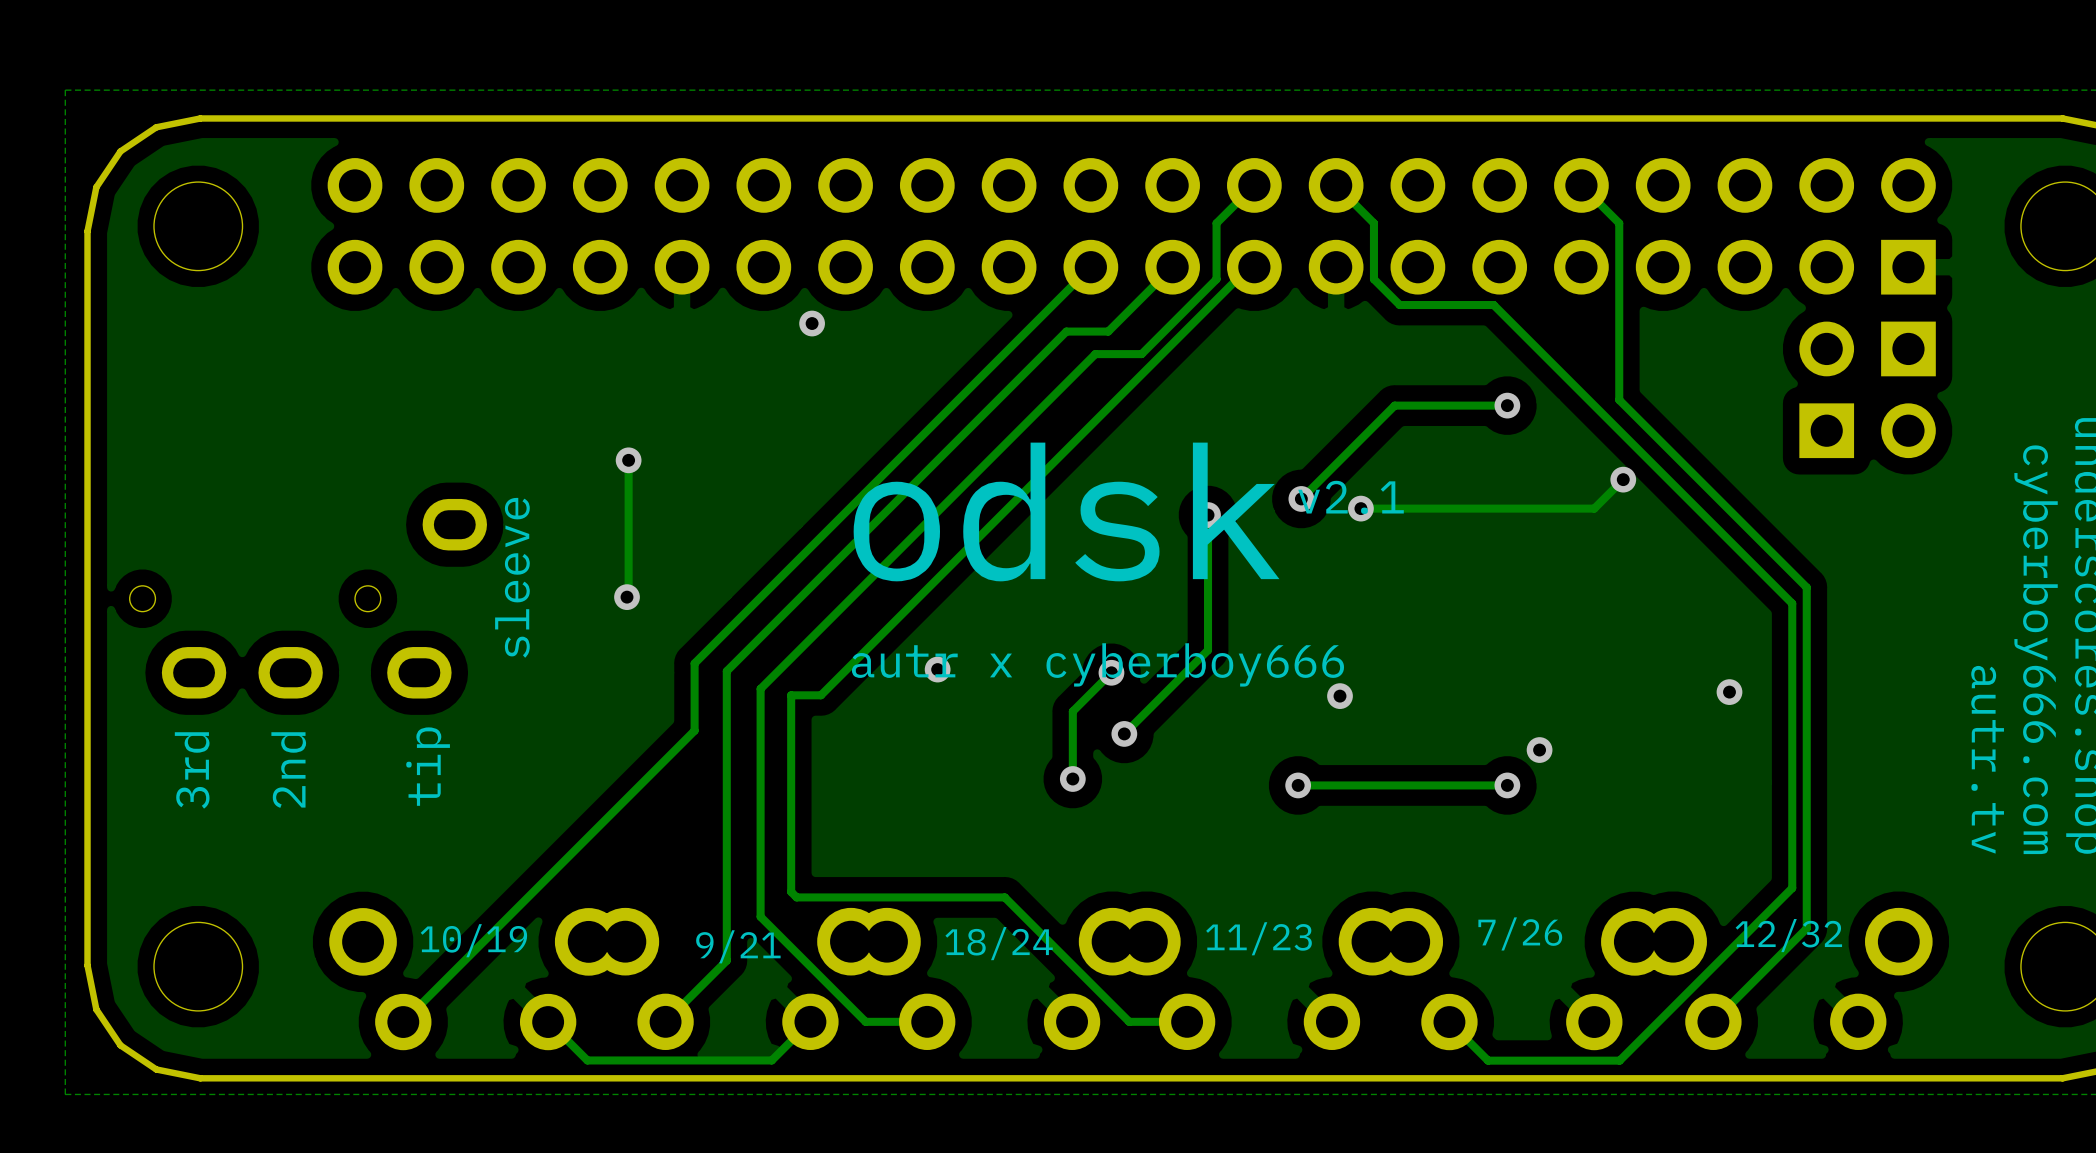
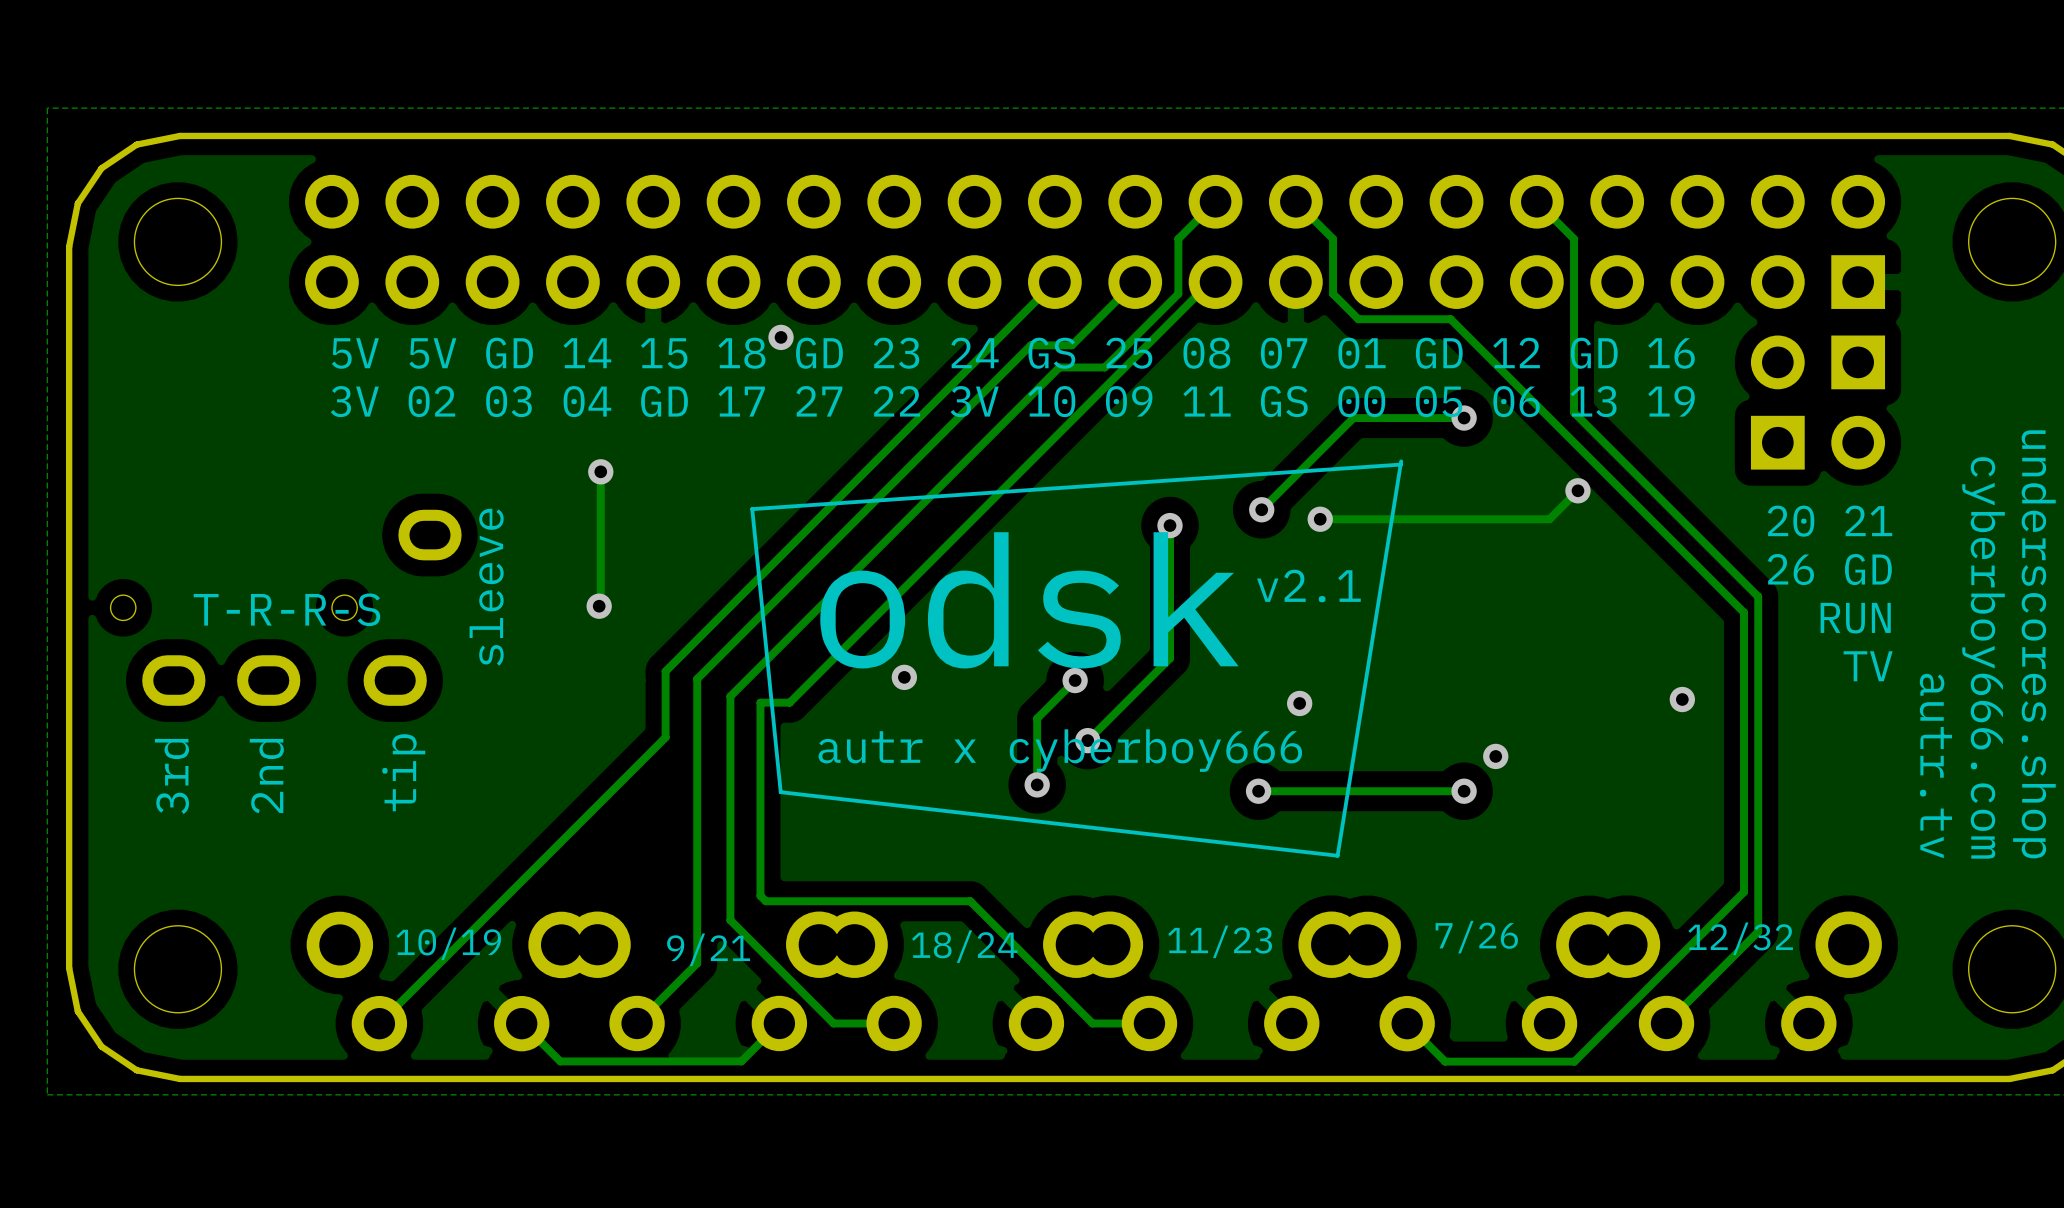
text: none -> 5V 5V GD 14 15 18 GD 23 24 GS 25 08 07 01 GD 12 GD 16 (1013, 353)
text: none -> 3V 02 03 04 GD 17 27 22 3V 10 09 11 GS 00 05 06 13 19 (1012, 401)
line: none -> (1401, 461) (1337, 855) (780, 792) (752, 509) (1401, 464)
text position: v2.1 (1351, 497) -> v2.1 (1308, 586)
text: none -> 20 21 (1830, 521)
text position: odsk (1066, 511) -> odsk (1029, 600)
text: none -> 26 GD (1829, 569)
text: none -> T-R-R-S (286, 609)
text: none -> RUN (1855, 618)
text: none -> TV (1868, 666)
text position: autr x cyberboy666 (1097, 664) -> autr x cyberboy666 (1060, 750)

